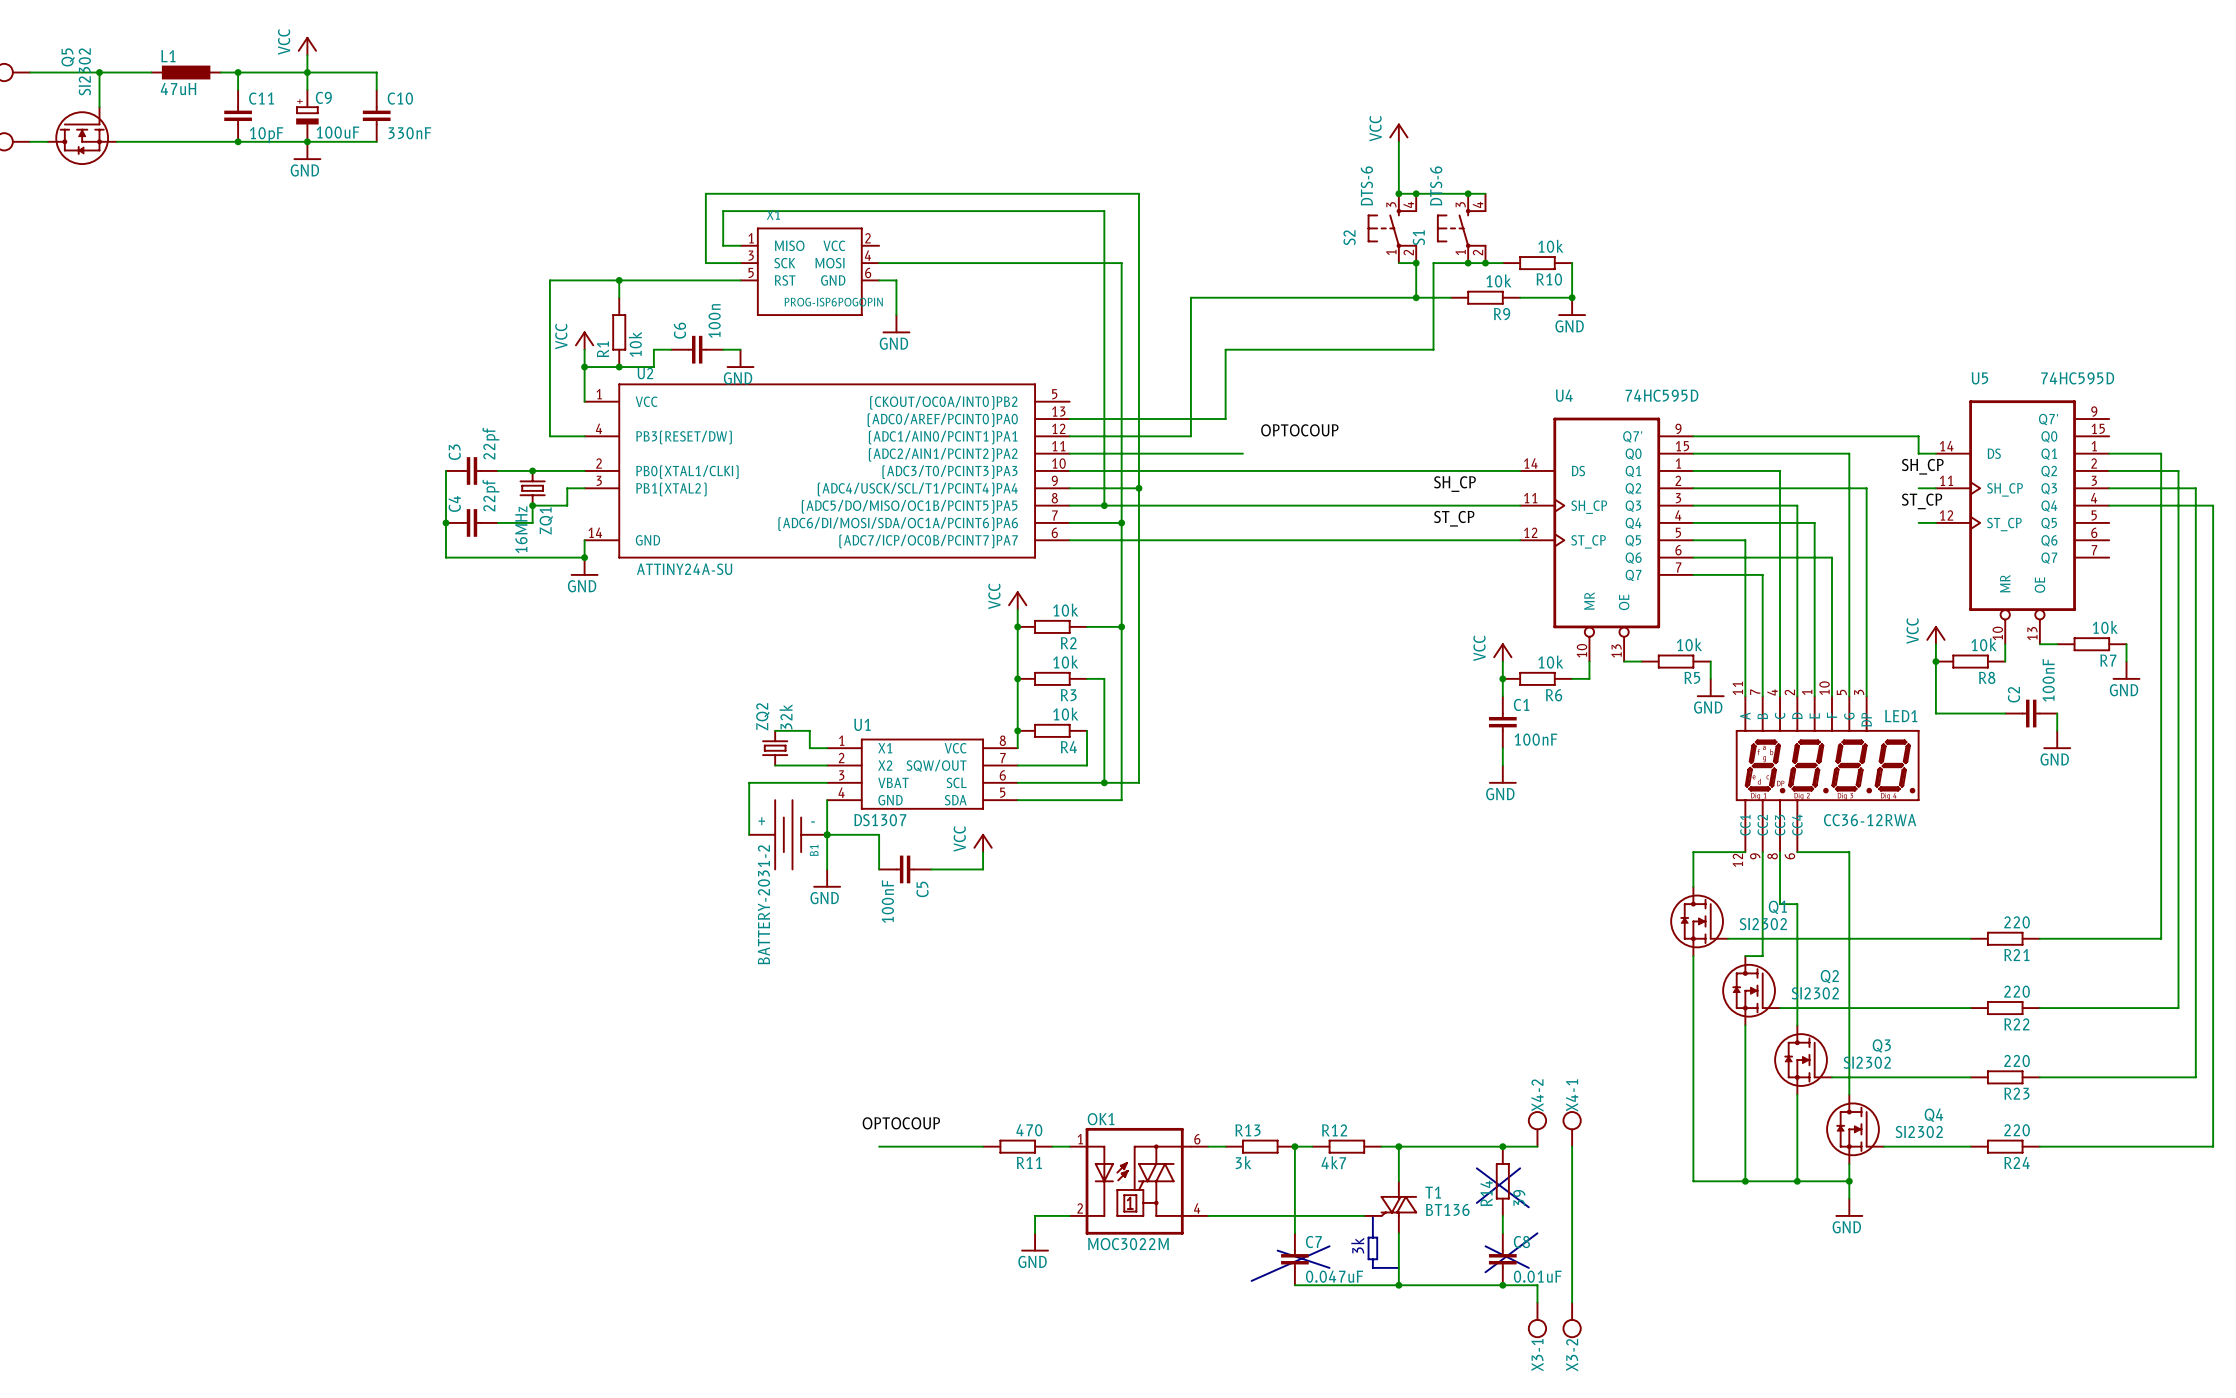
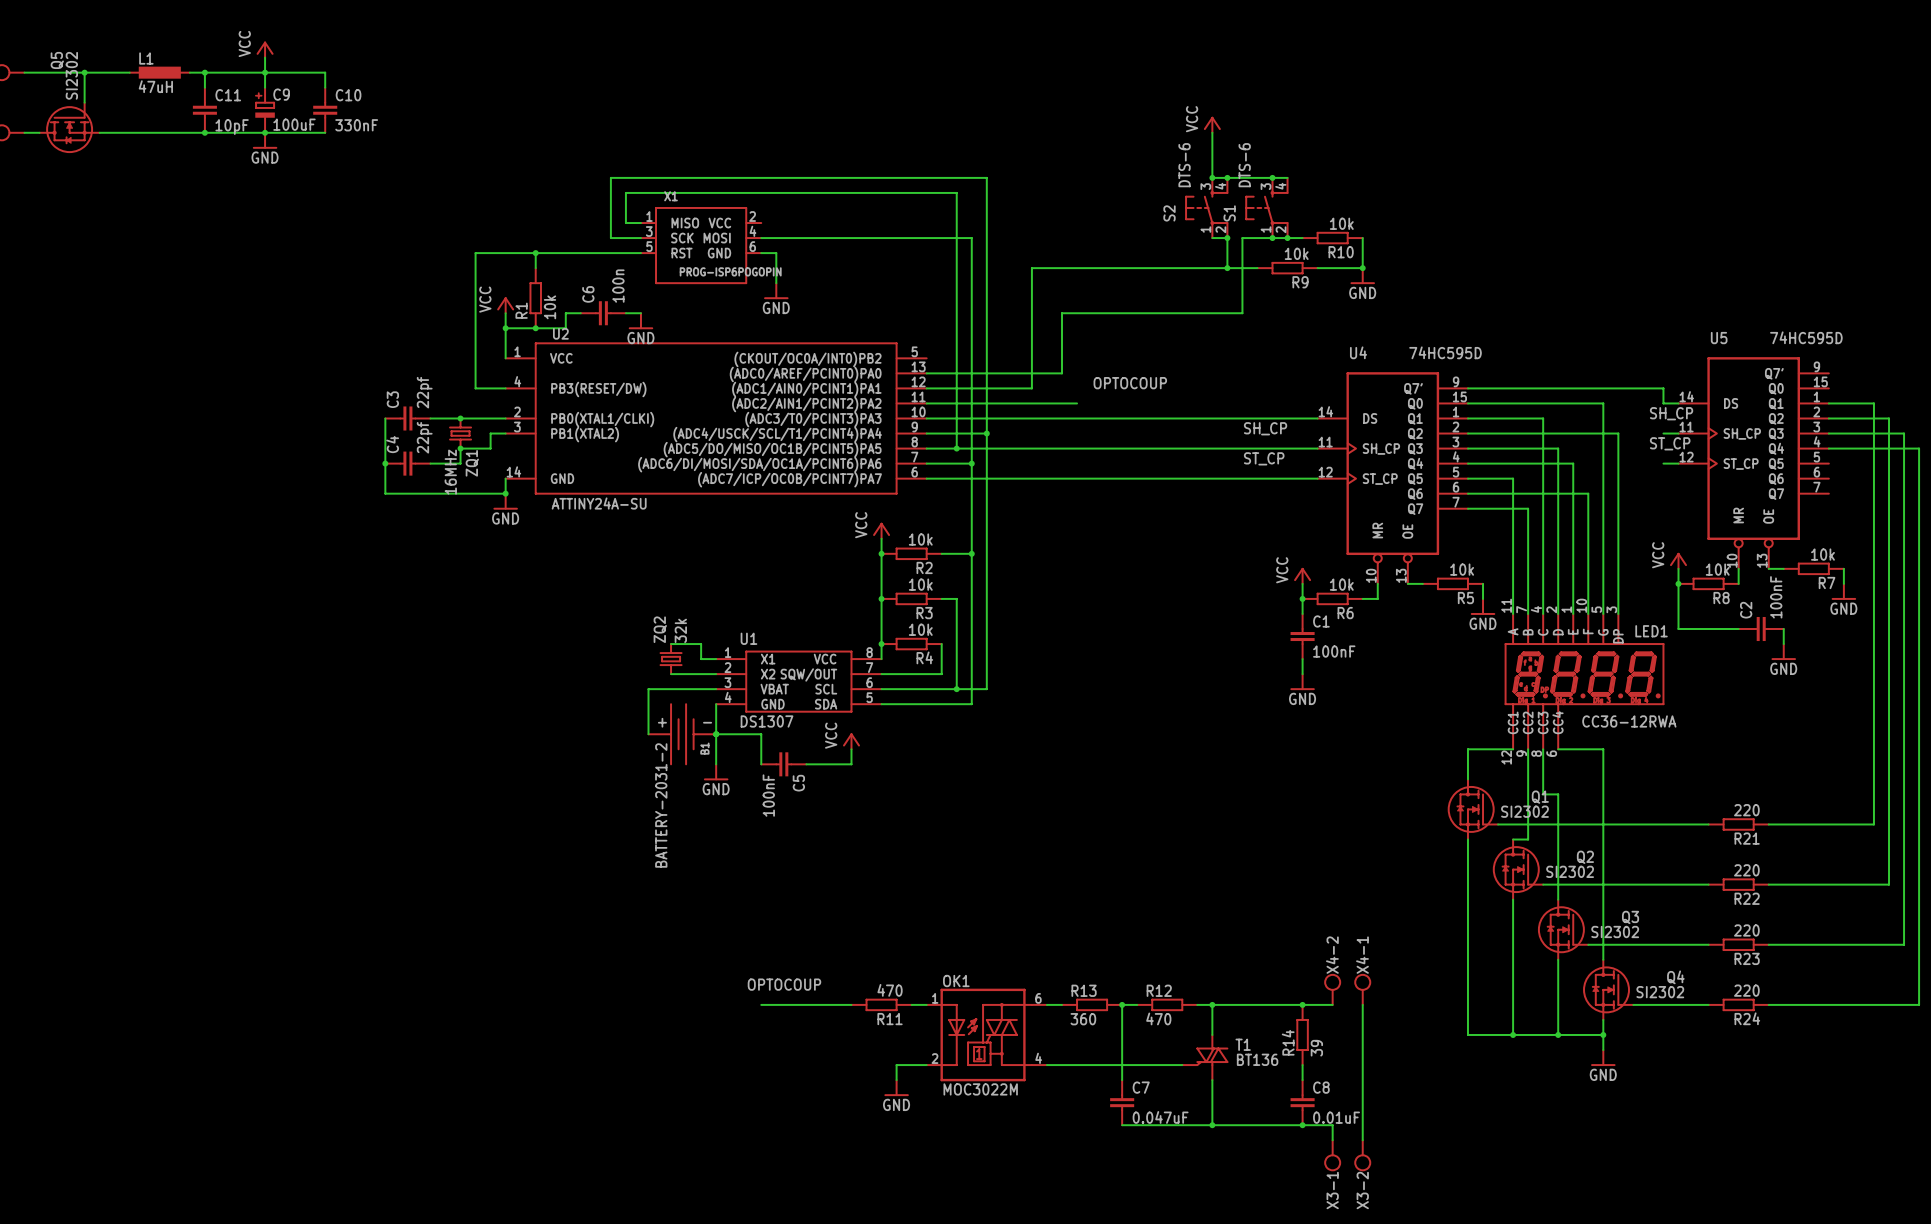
R13 value: 3k (1243, 1162) -> 360 (1083, 1019)
R12 value: 4k7 (1333, 1162) -> 470 (1158, 1018)
line: (1476, 1168) (1528, 1207) -> none
line: (1520, 1168) (1476, 1202) -> none
line: (1372, 1215) (1372, 1237) -> none
line: (1537, 1233) (1485, 1272) -> none
line: (1368, 1237) (1368, 1259) (1377, 1259) (1377, 1237) (1368, 1237) -> none
text: 3k (1357, 1245) -> none
line: (1329, 1246) (1251, 1280) -> none
line: (1485, 1246) (1528, 1267) -> none
line: (1277, 1250) (1329, 1267) -> none
line: (1372, 1259) (1372, 1267) (1398, 1267) -> none

